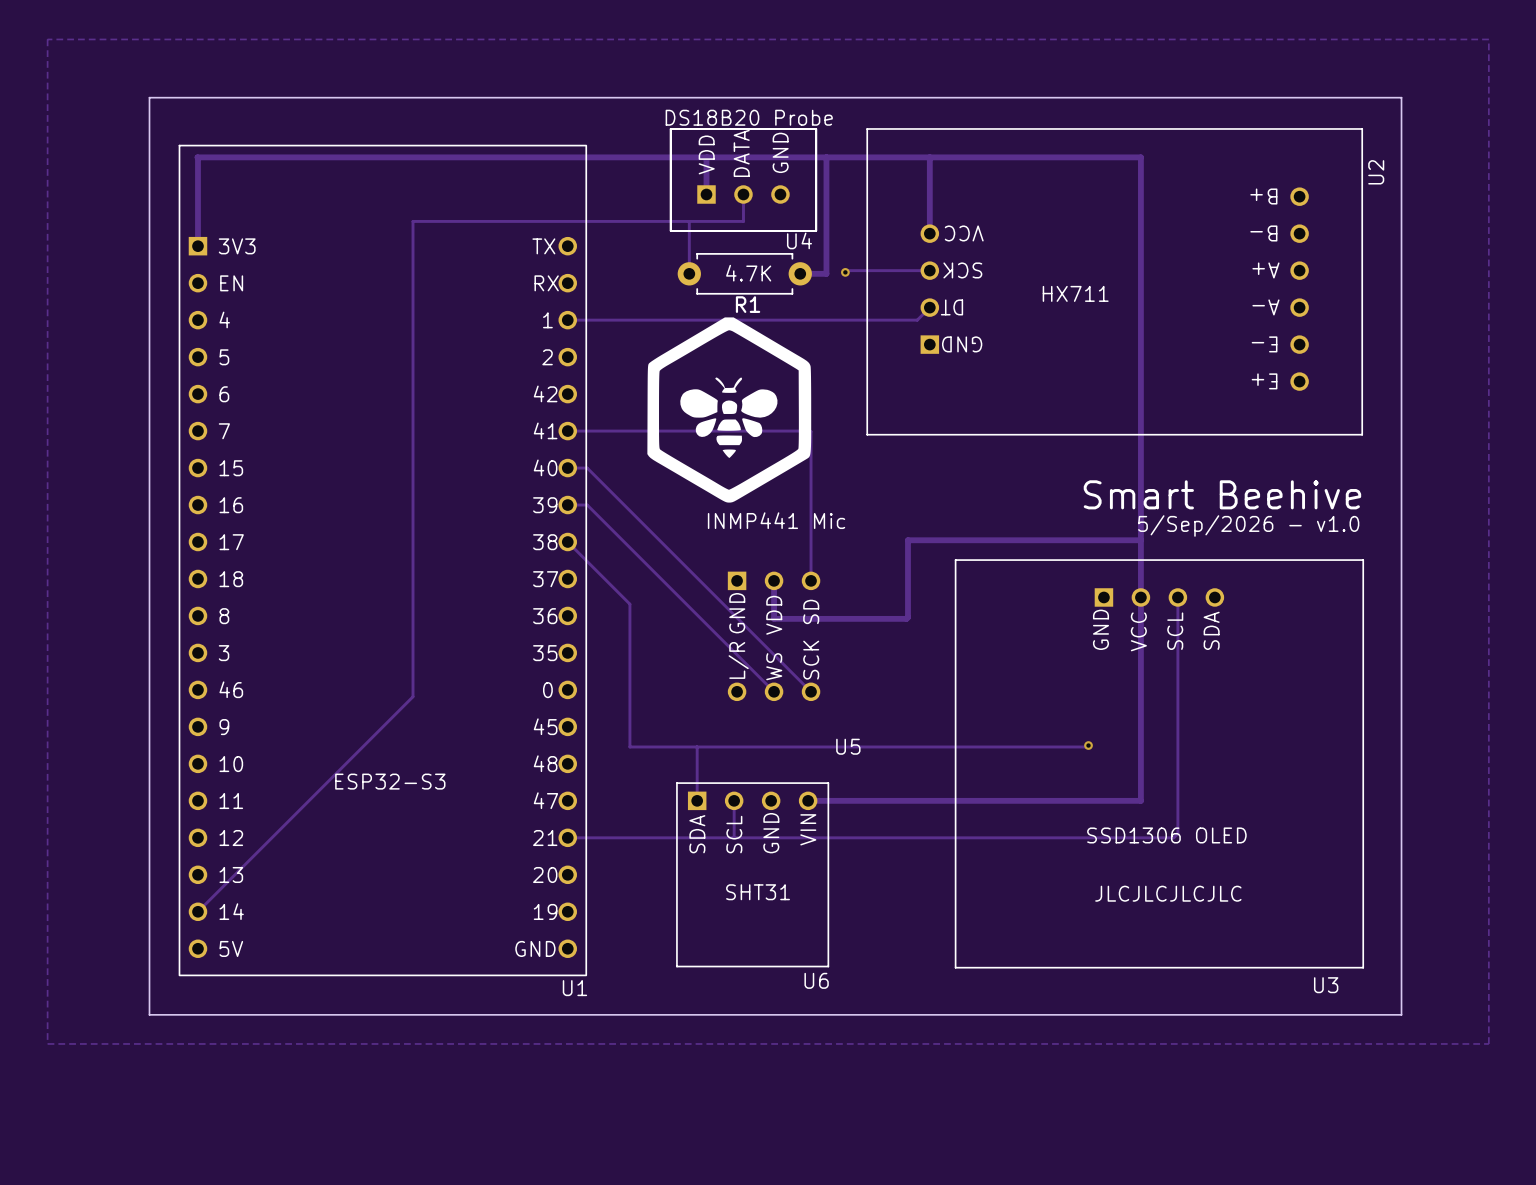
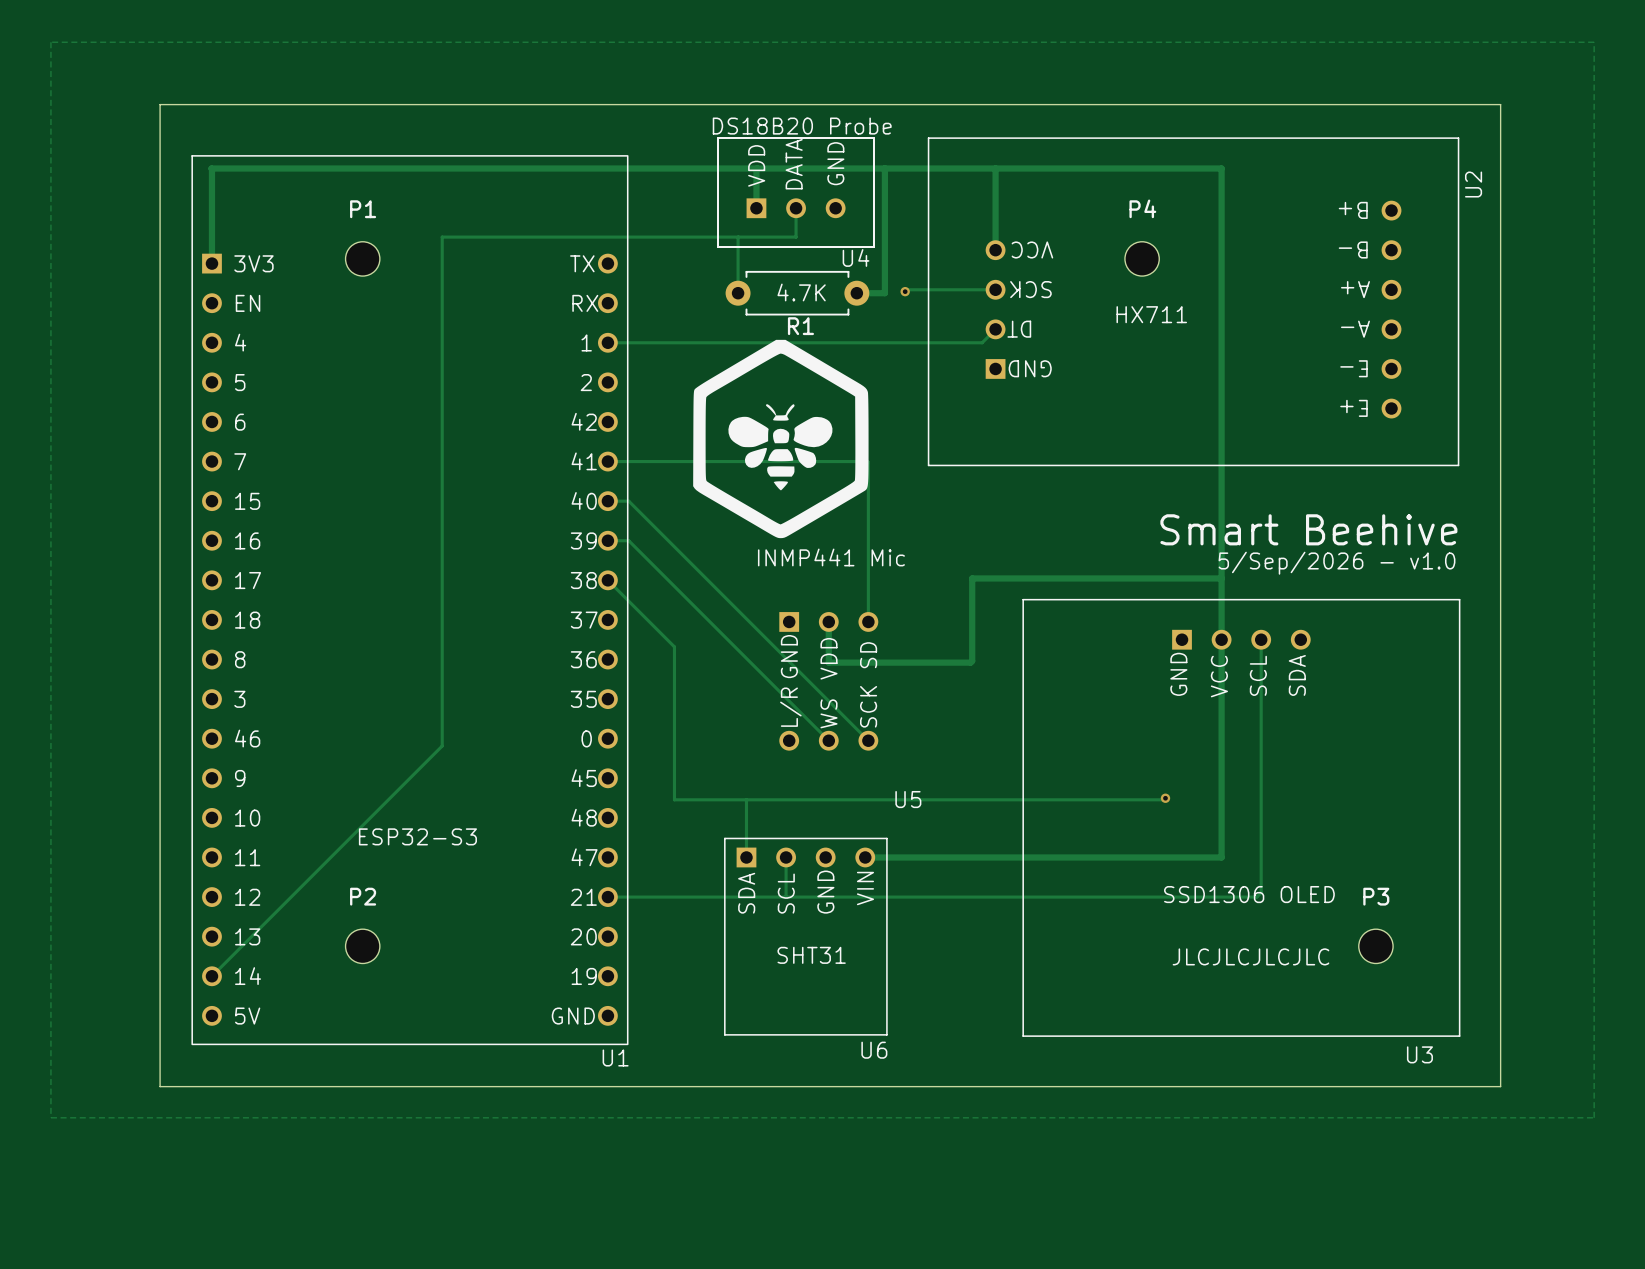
P1: none -> (362, 258)
P4: none -> (1142, 258)
P2: none -> (362, 946)
P3: none -> (1375, 946)

